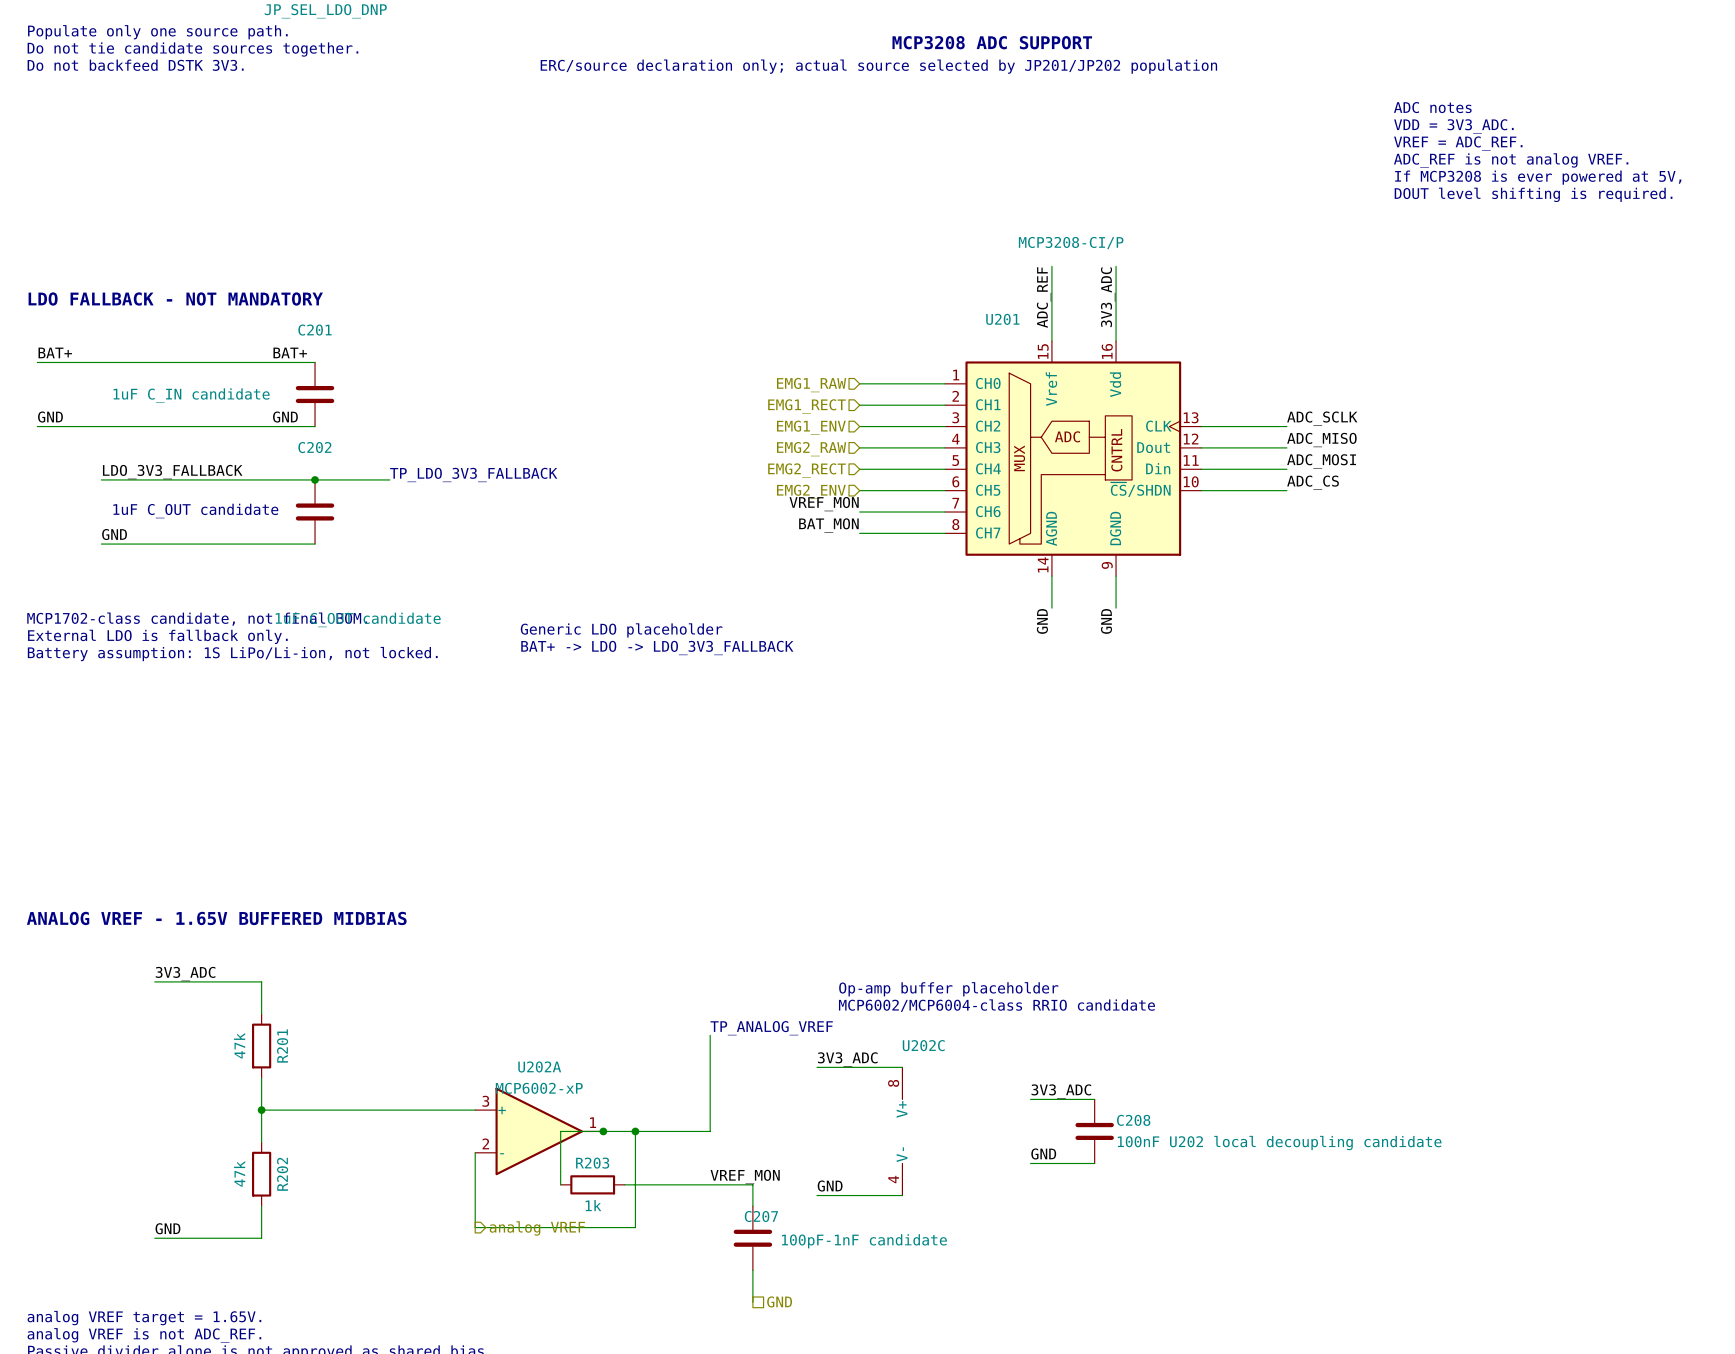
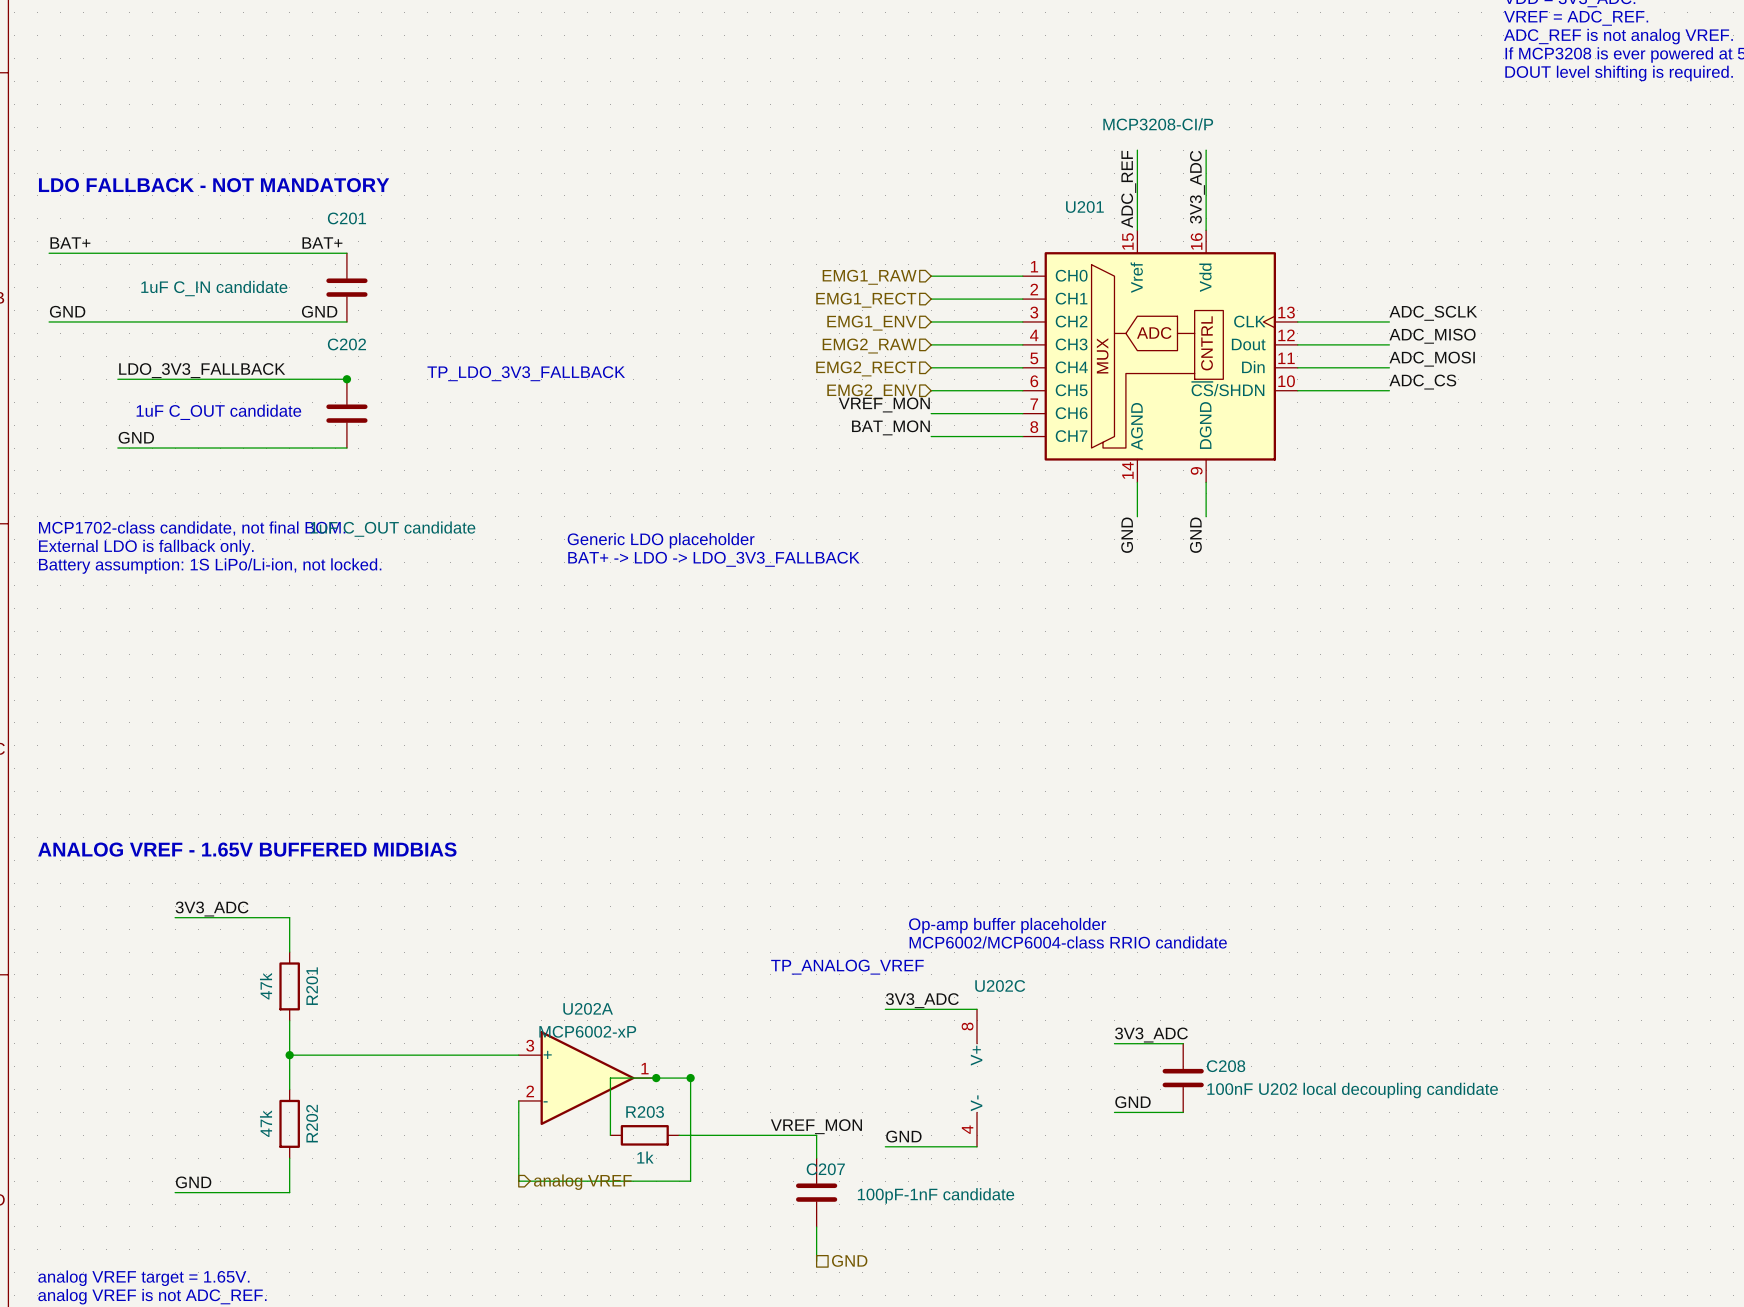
wire: (315, 479) (389, 479) -> none
wire: (710, 1035) (710, 1131) (635, 1131) -> none

